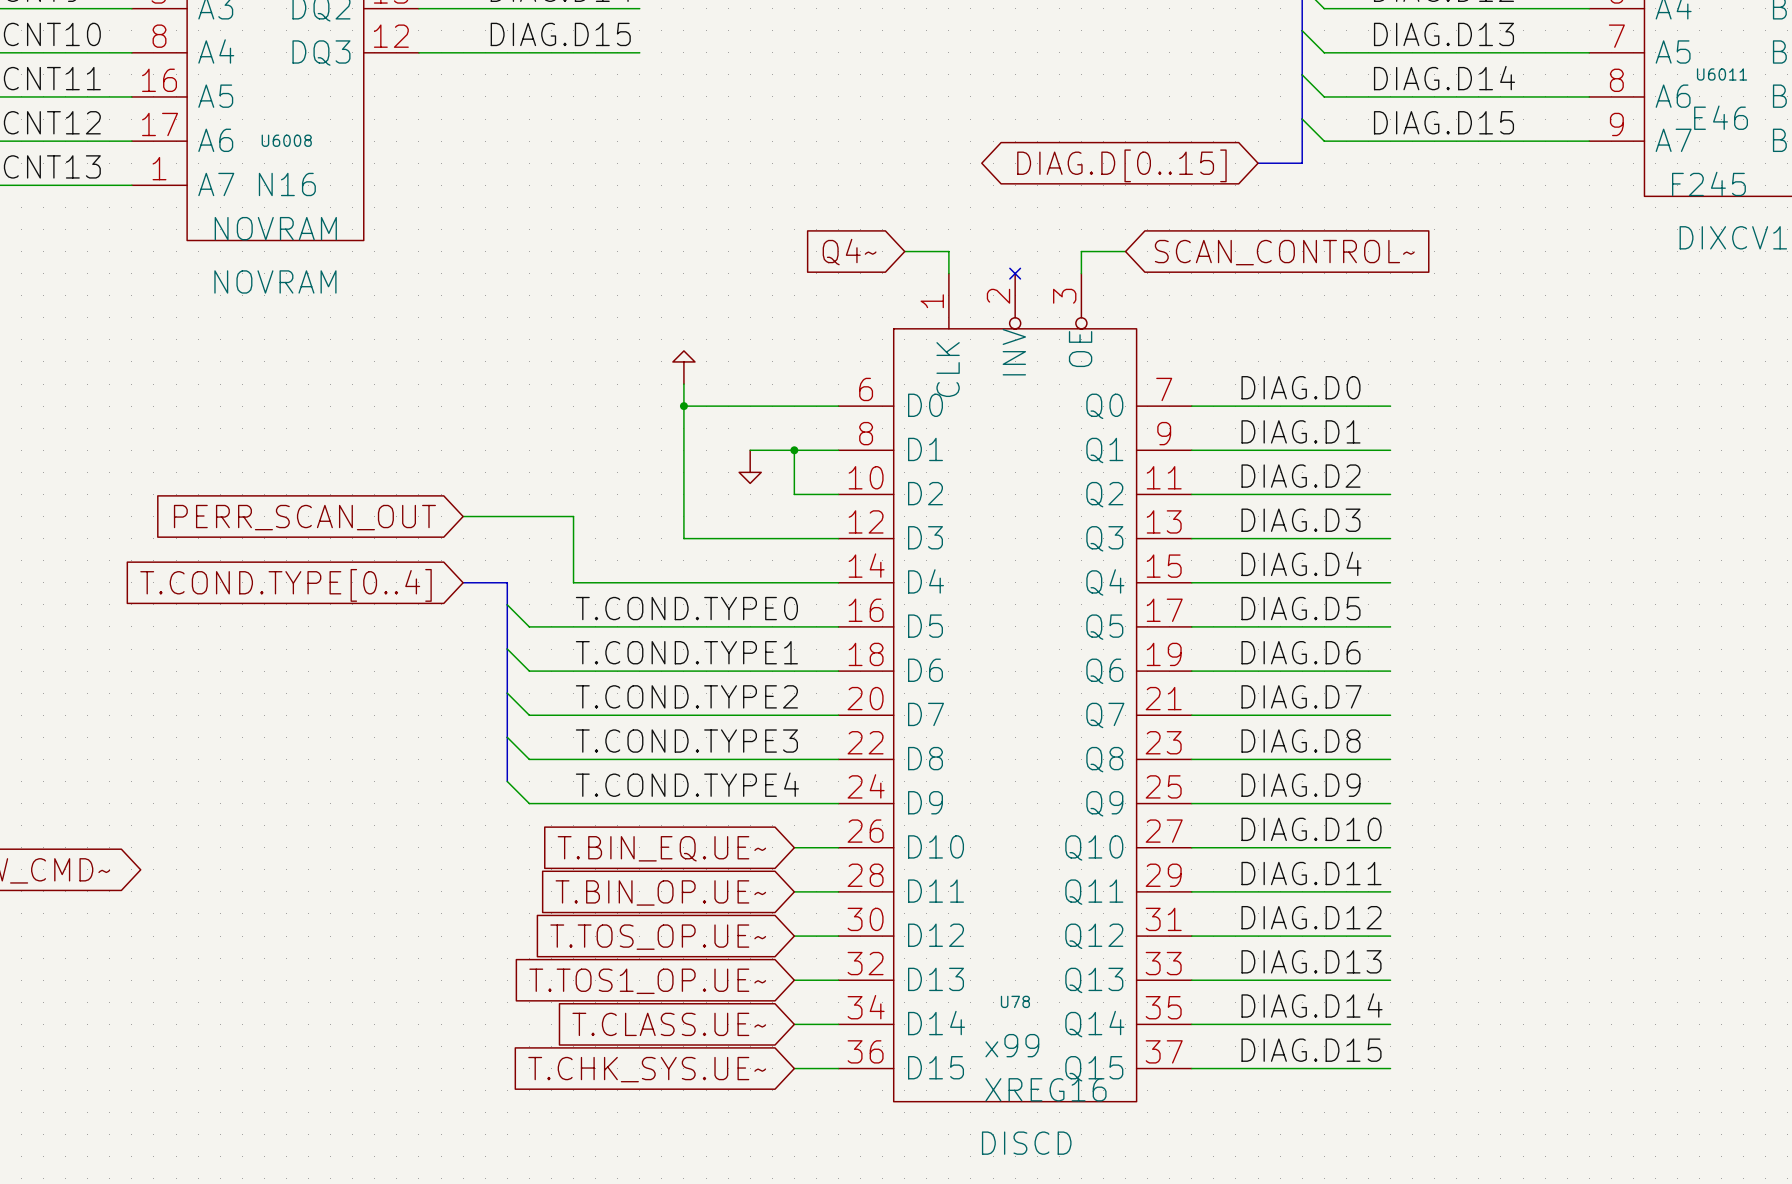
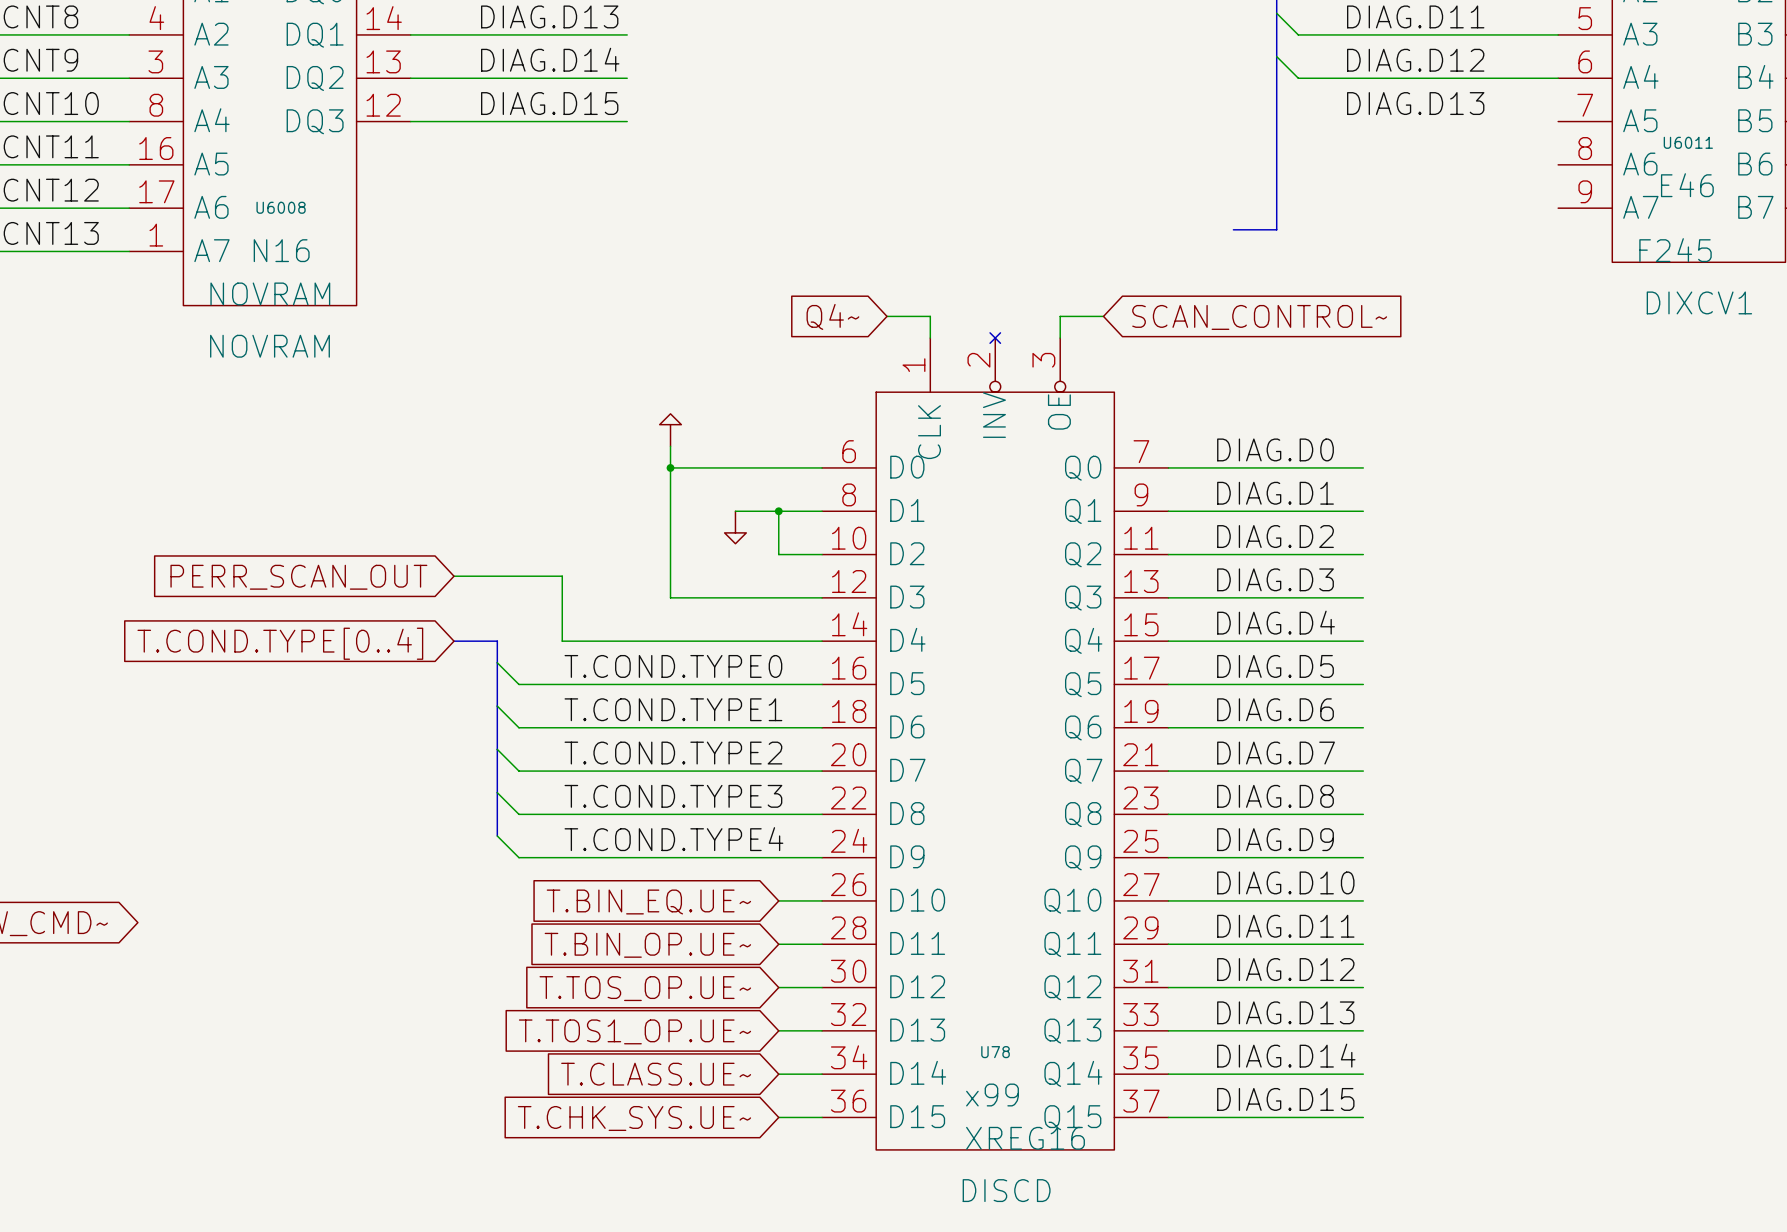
wire: (1302, 30) (1324, 52) (1589, 52) -> none
wire: (1302, 74) (1324, 96) (1589, 96) -> none
label: DIAG.D14 (1444, 78) -> none
wire: (1302, 119) (1324, 141) (1589, 141) -> none
label: DIAG.D15 (1443, 122) -> none
global label: DIAG.D[0..15] (1121, 165) -> none

